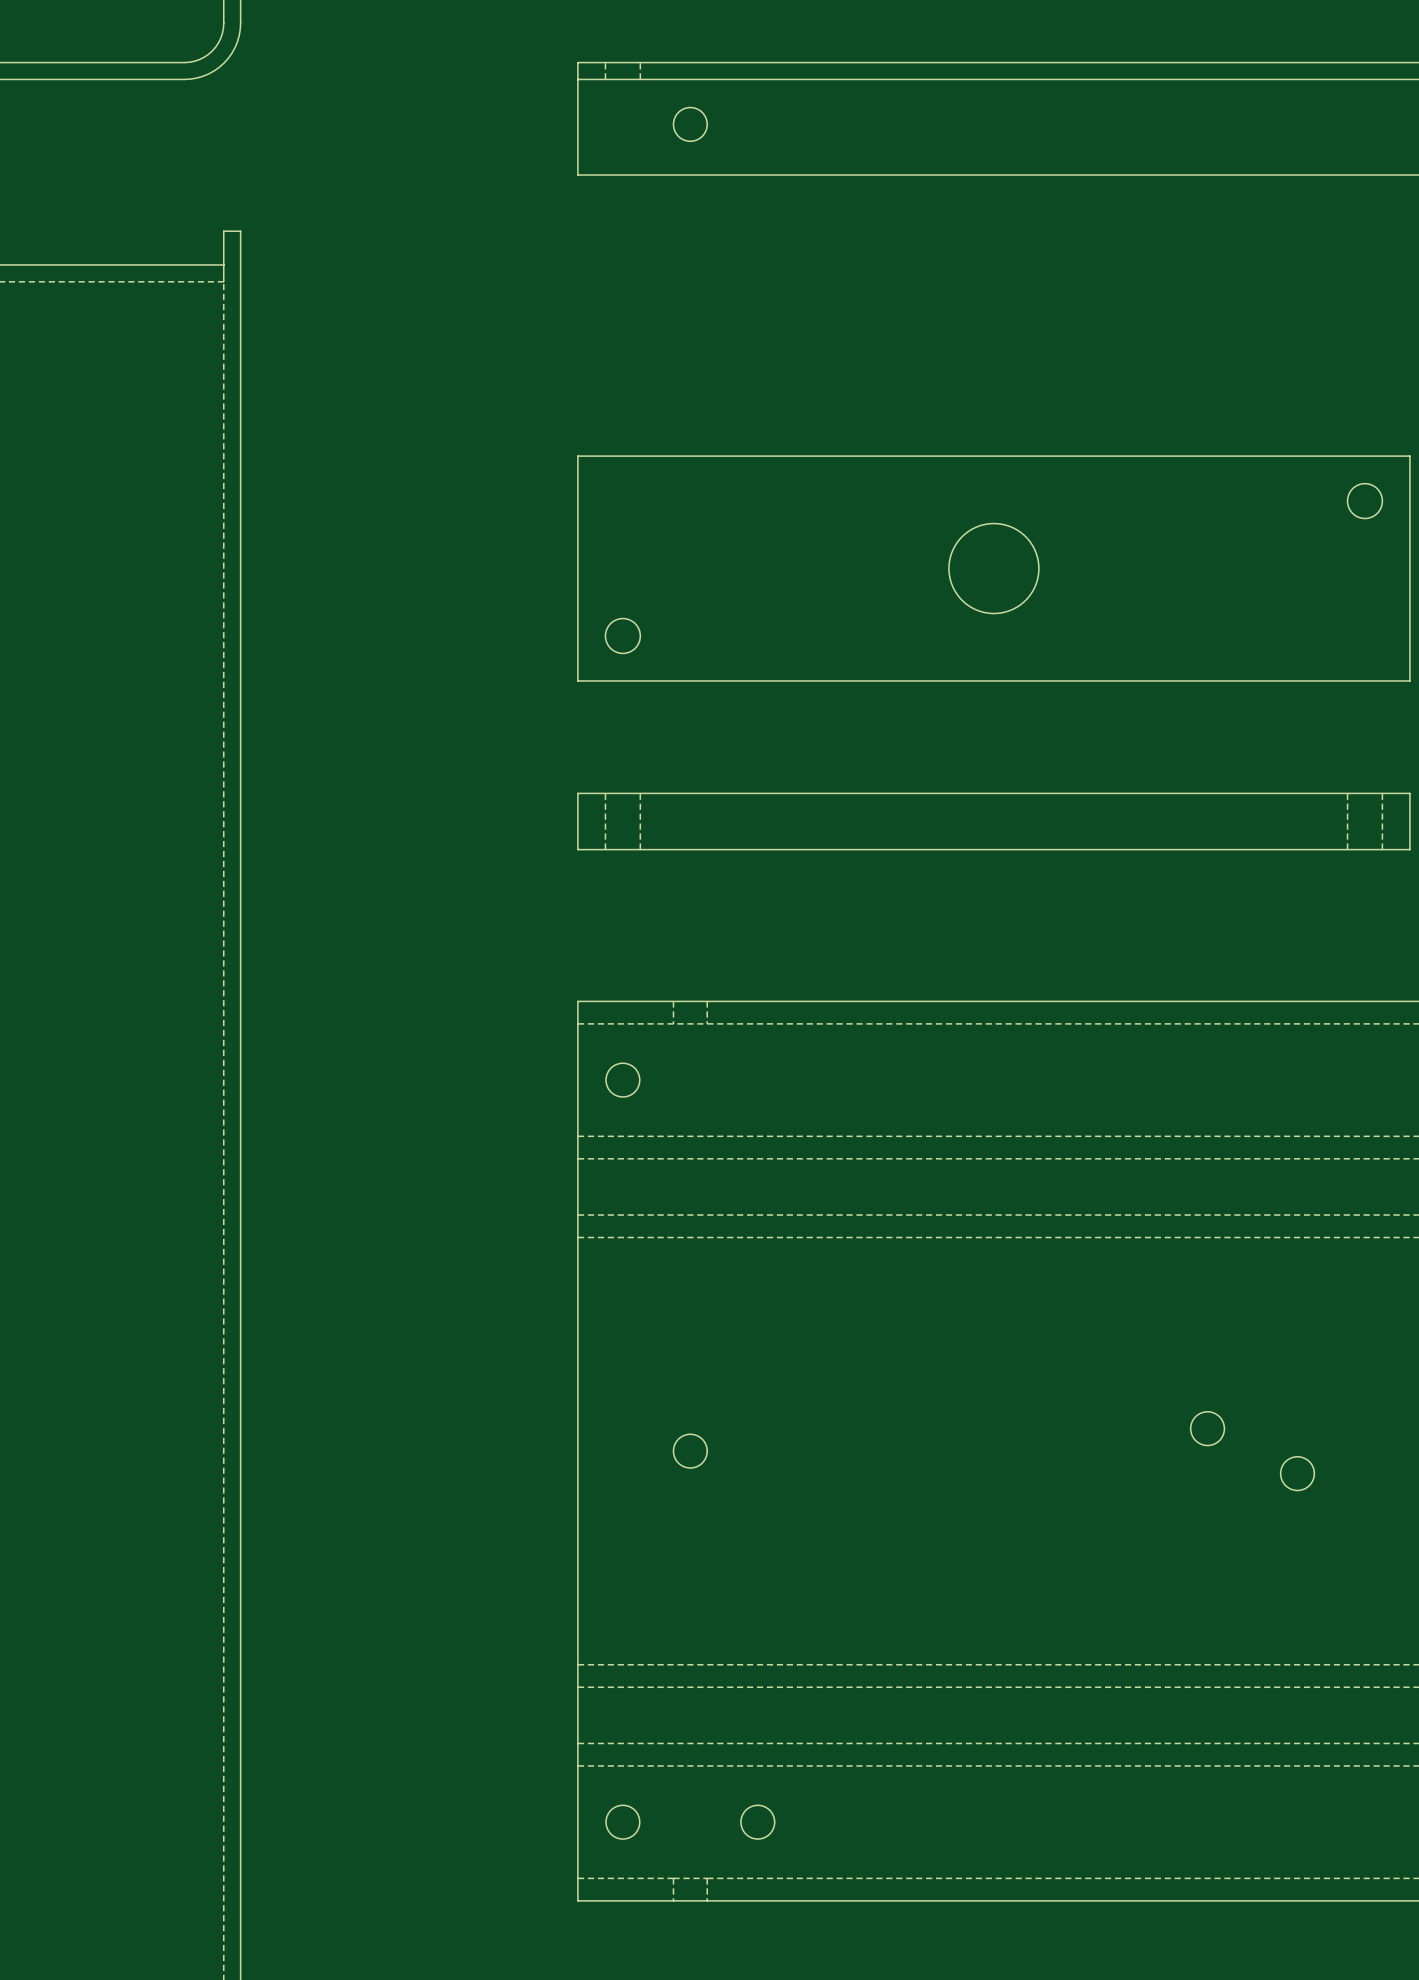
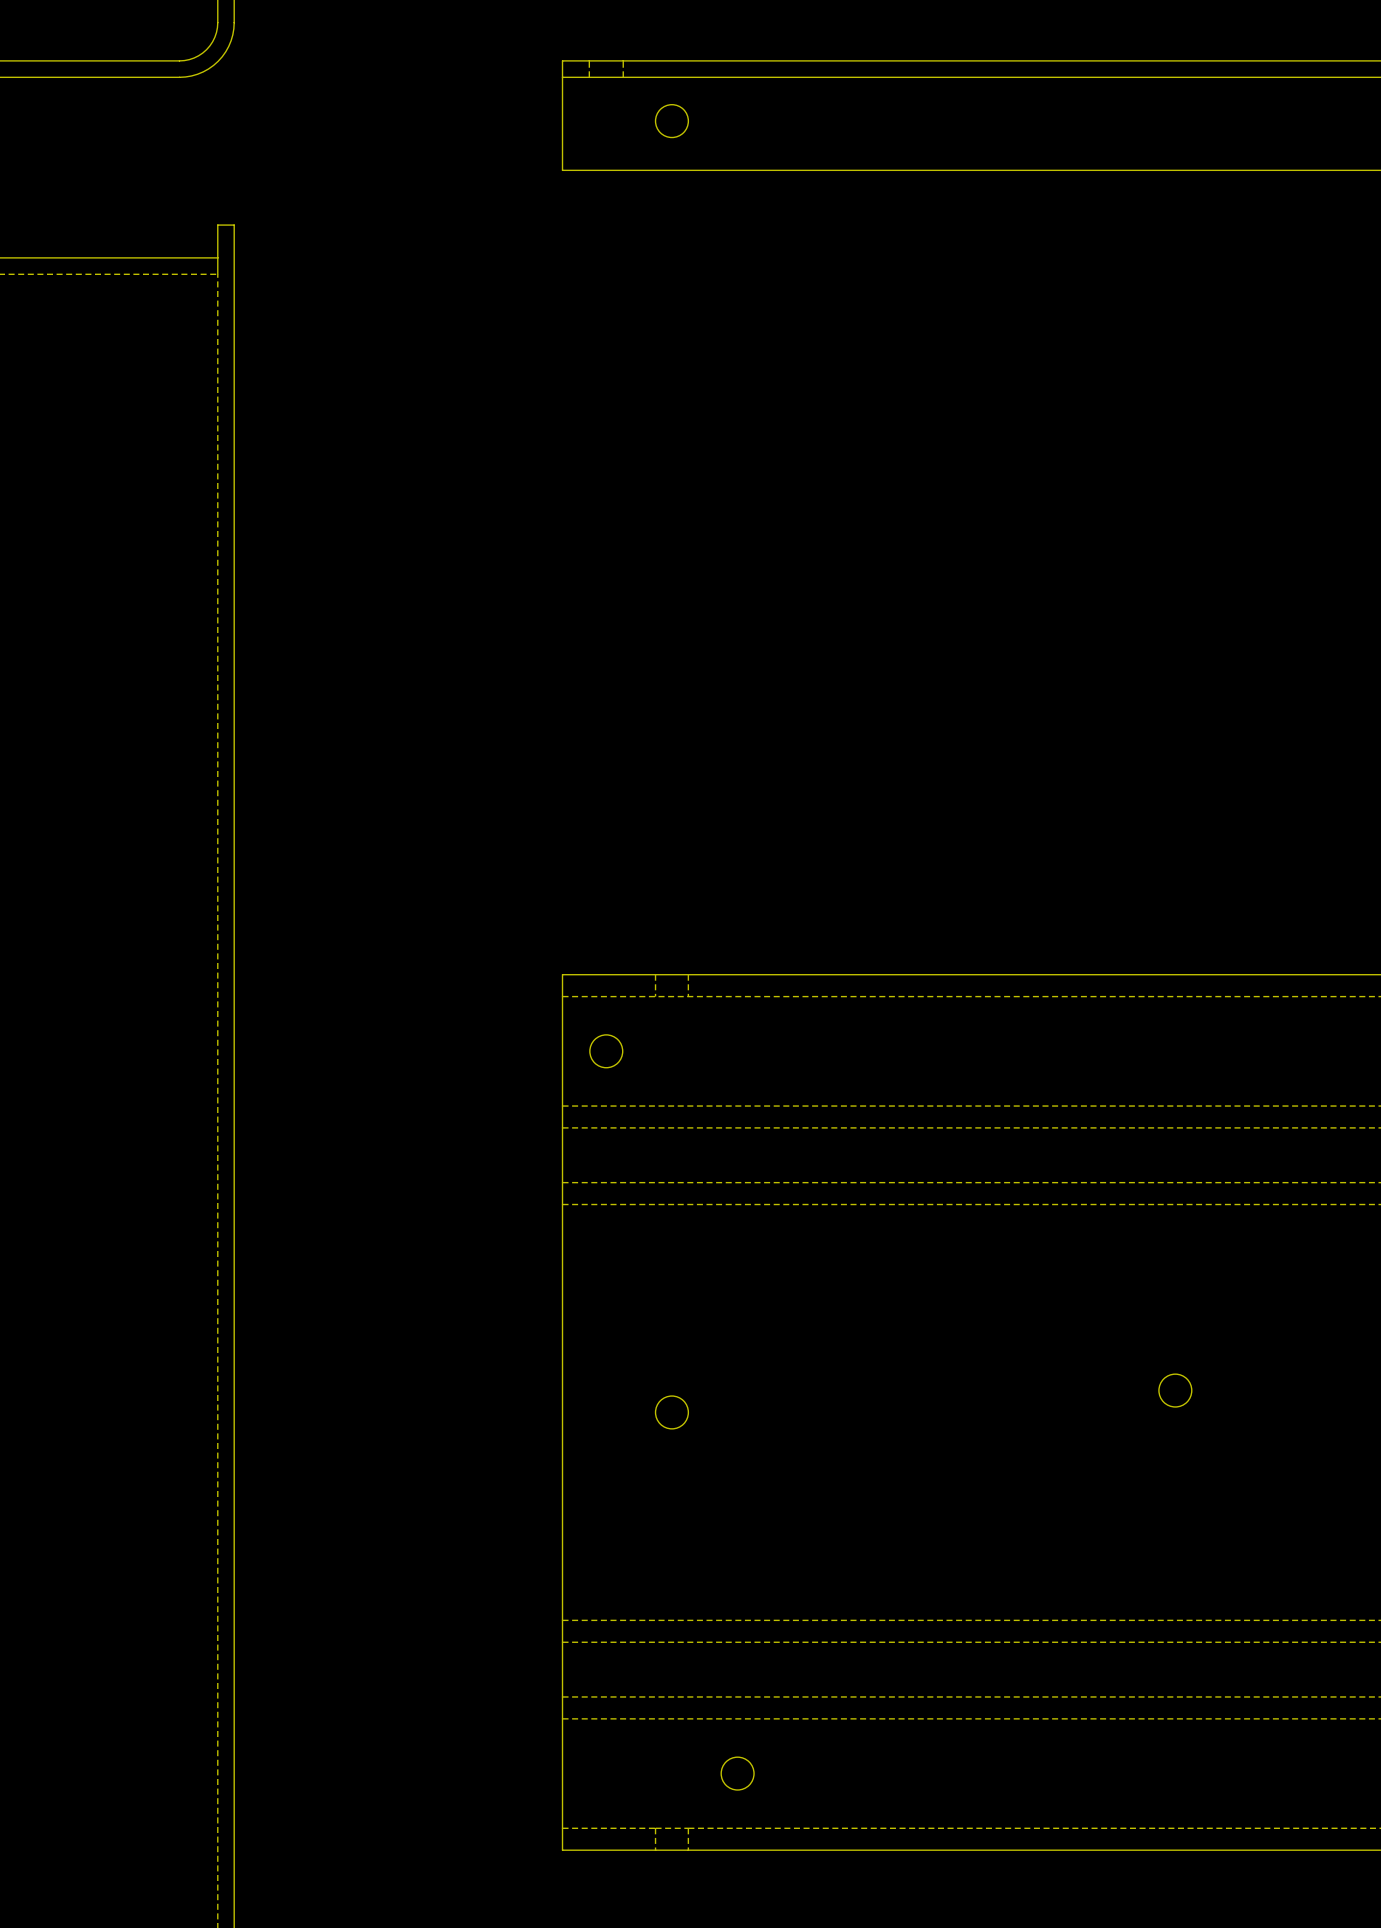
board edge: (577, 456) (1409, 456) (1409, 680) (577, 680) (577, 456) -> none
round board edge: [1346, 483, 1383, 520] -> none
round board edge: [948, 522, 1040, 615] -> none
round board edge: [604, 618, 641, 654] -> none
board edge: (577, 793) (577, 849) (1409, 849) (1409, 793) (577, 793) -> none
board edge: (605, 793) (605, 849) -> none
board edge: (640, 793) (640, 849) -> none
board edge: (1347, 793) (1347, 849) -> none
board edge: (1382, 793) (1382, 849) -> none
round board edge: [1280, 1456, 1315, 1492] -> none
round board edge: [605, 1804, 641, 1840] -> none

